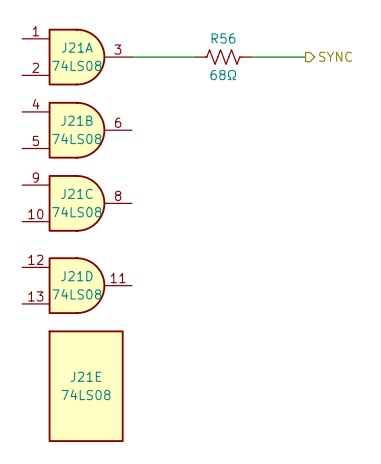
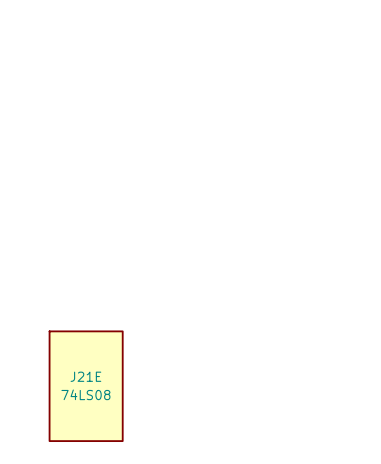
hierarchical label: SYNC (335, 56) -> none
J21A: 74LS08 (77, 57) -> none
wire: (131, 57) (195, 57) -> none
R56: 68Ω (223, 57) -> none
wire: (250, 57) (305, 57) -> none
J21B: 74LS08 (77, 130) -> none
J21C: 74LS08 (77, 203) -> none
J21D: 74LS08 (77, 285) -> none

